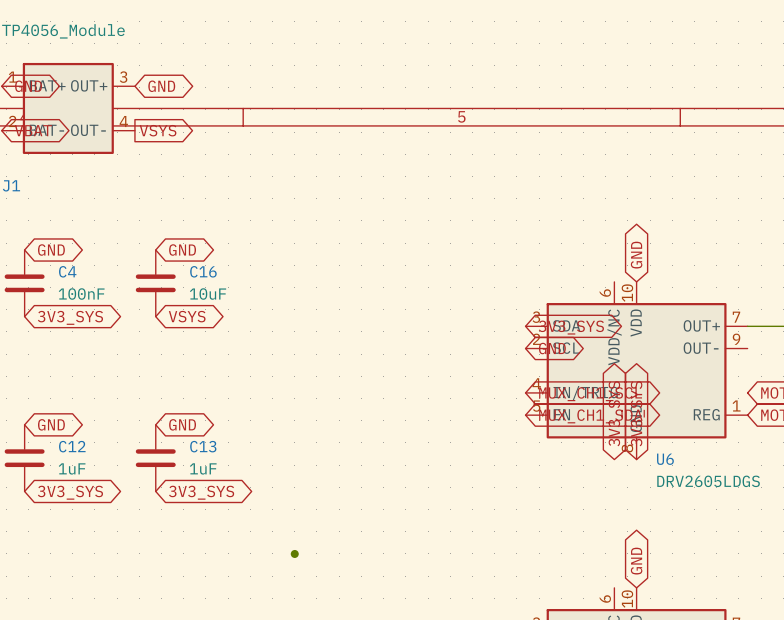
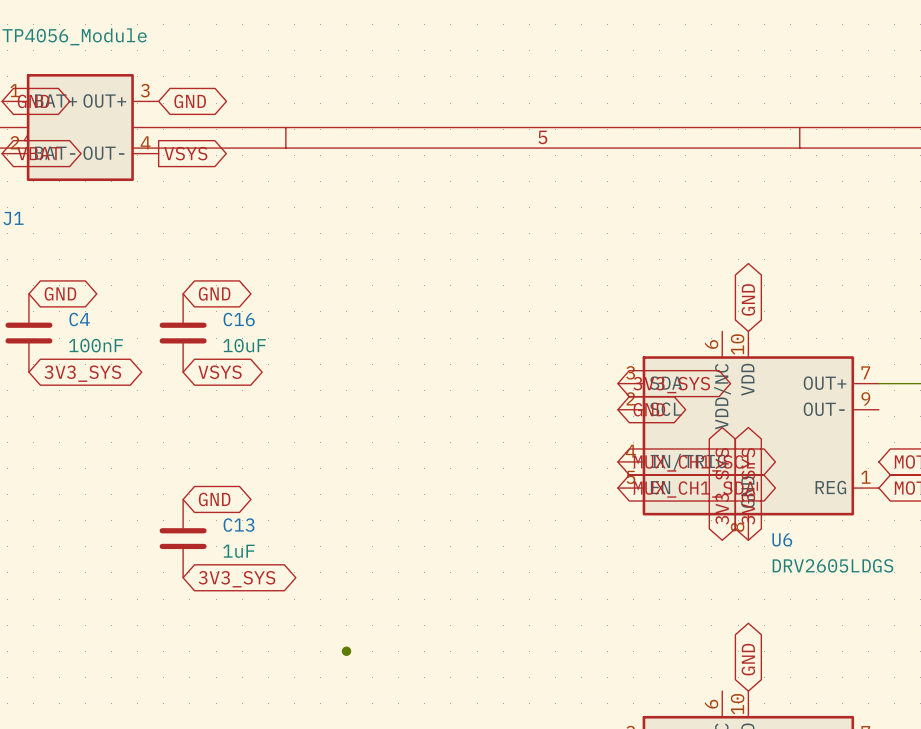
global label: GND (51, 424) -> none
C12: 1uF (24, 458) -> none
global label: 3V3_SYS (70, 492) -> none

